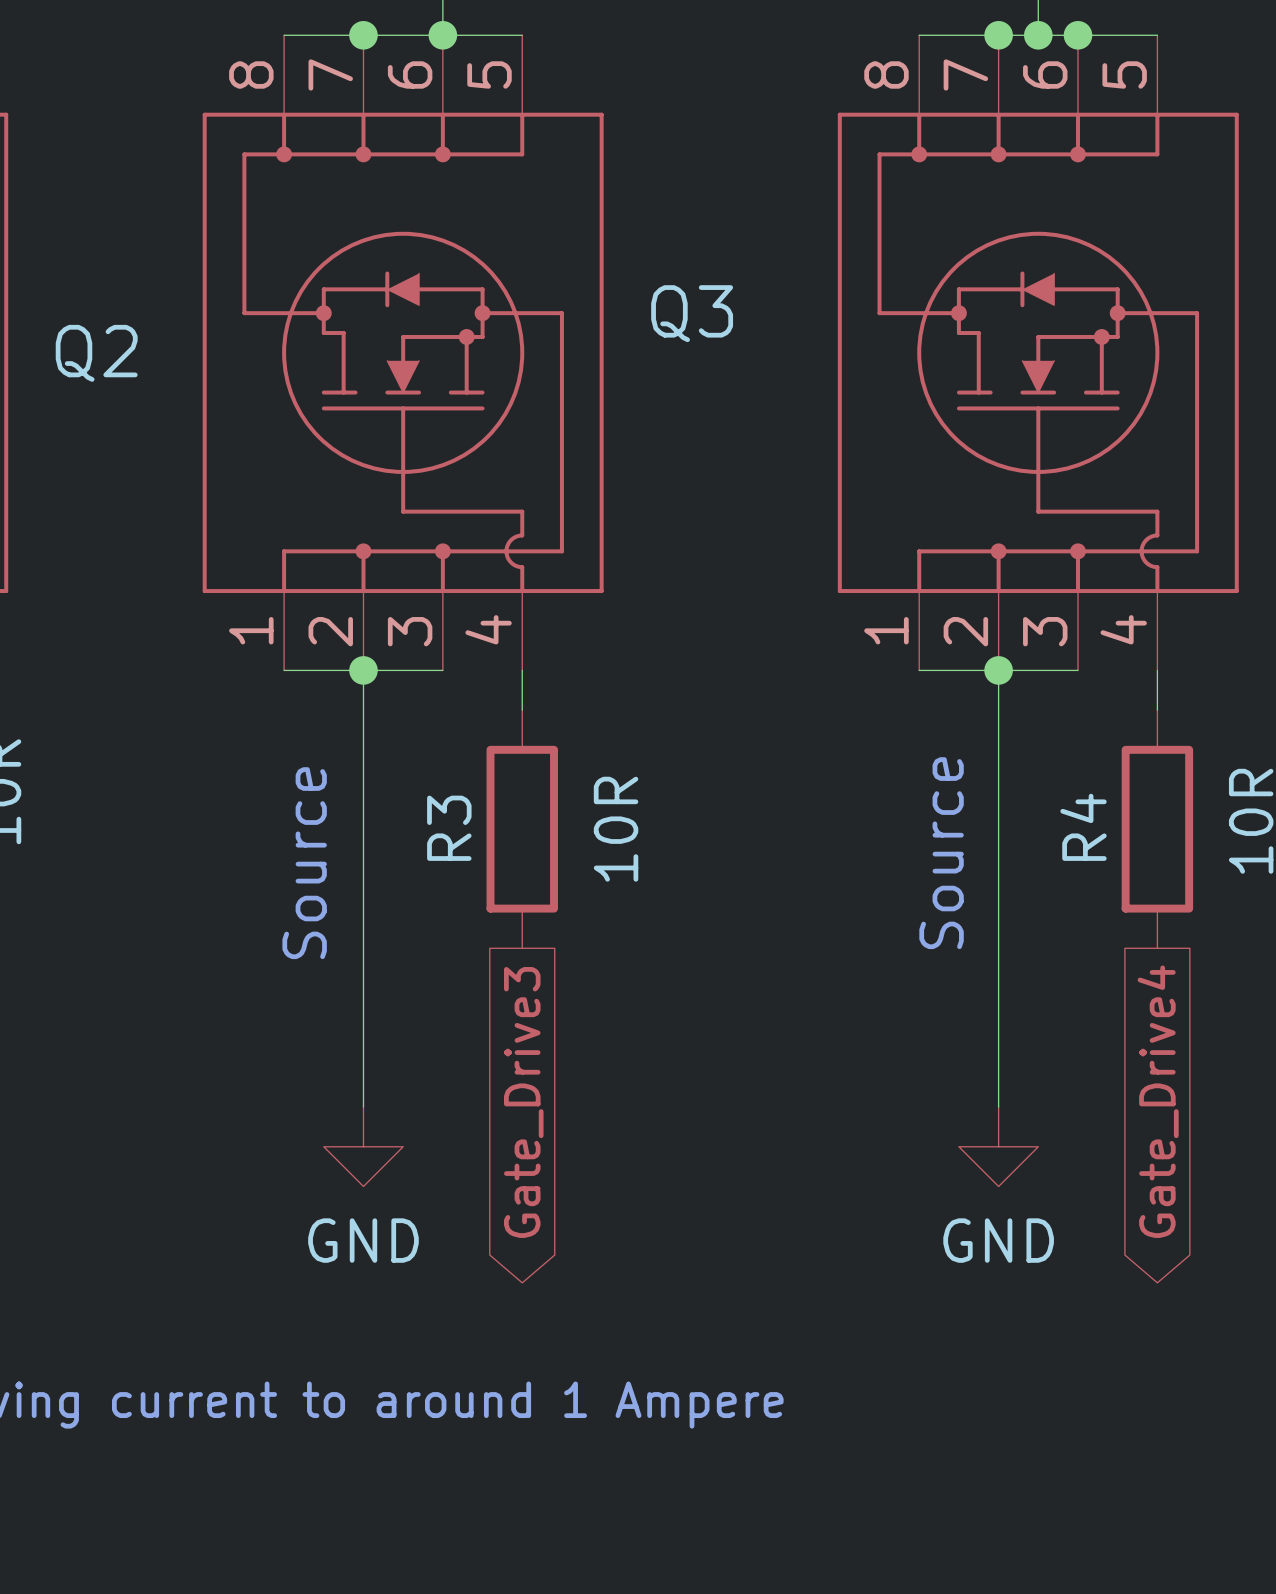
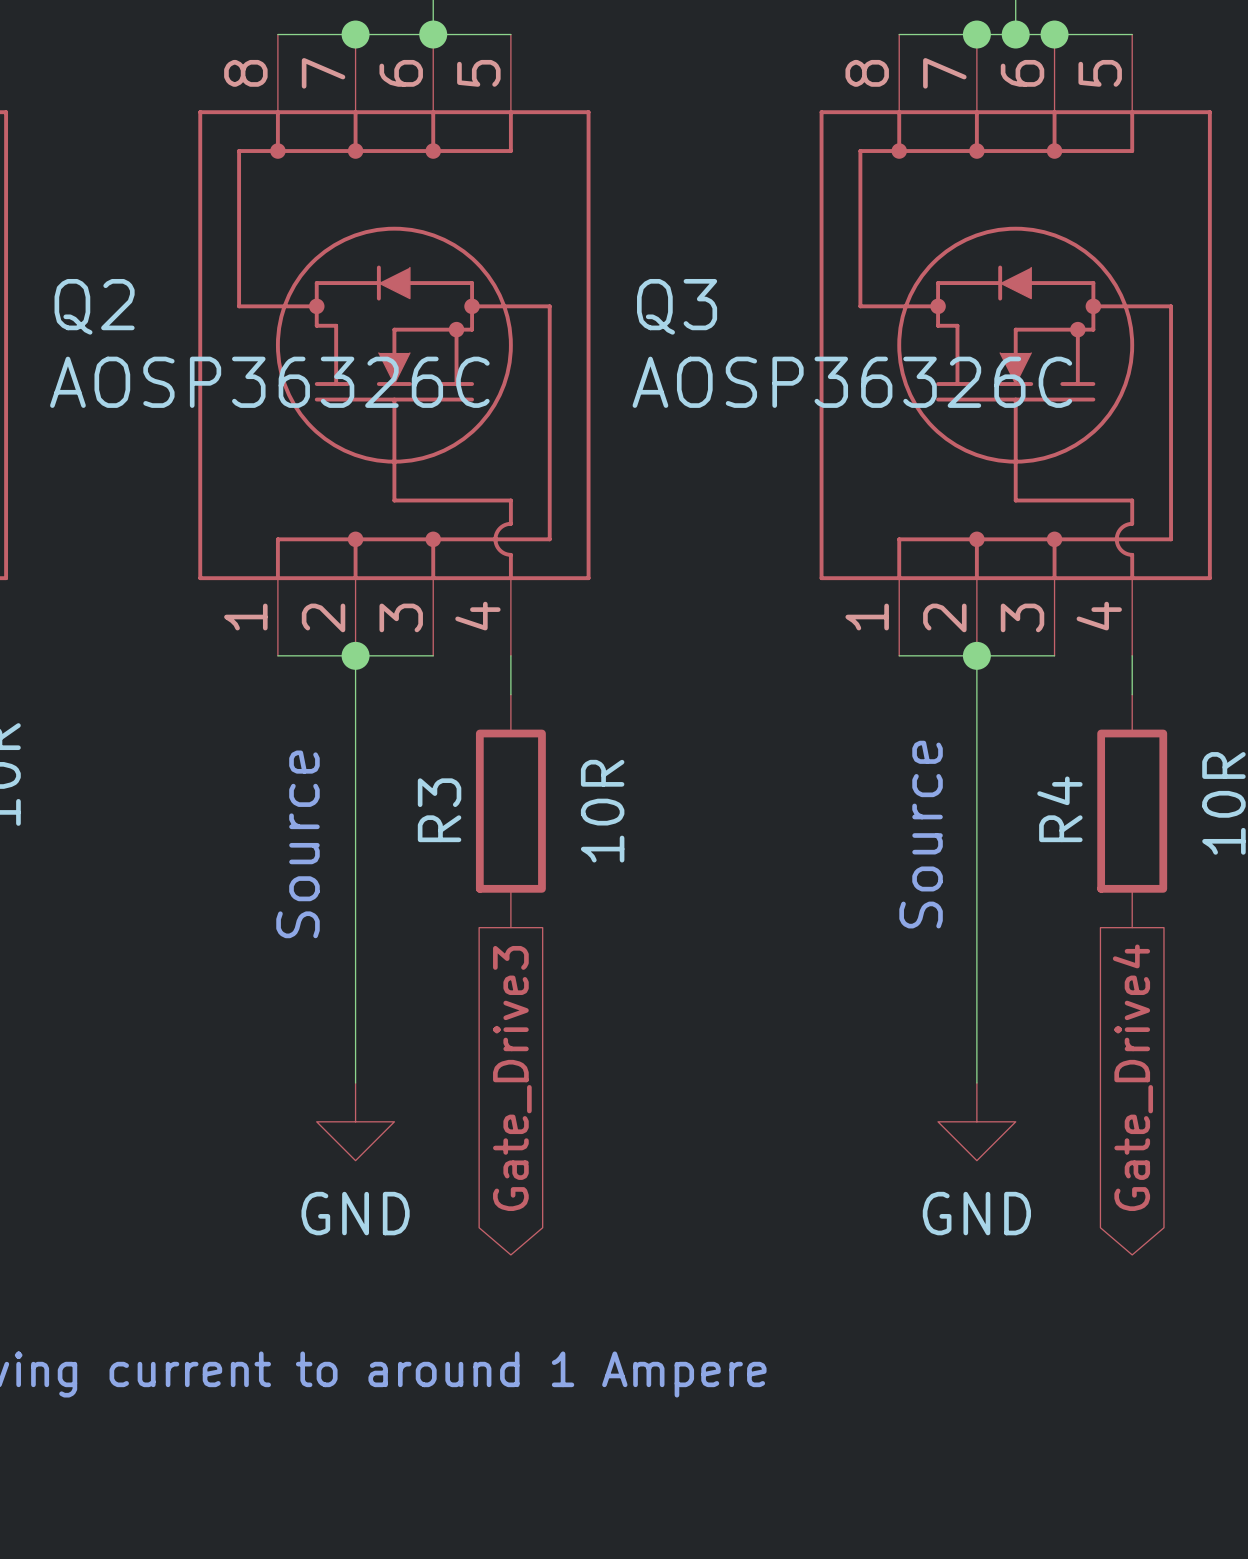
Q2 name position: Q2 (96, 353) -> Q2 (94, 306)
Q2 value: none -> AOSP36326C (269, 382)
Q3 value: none -> AOSP36326C (852, 382)

